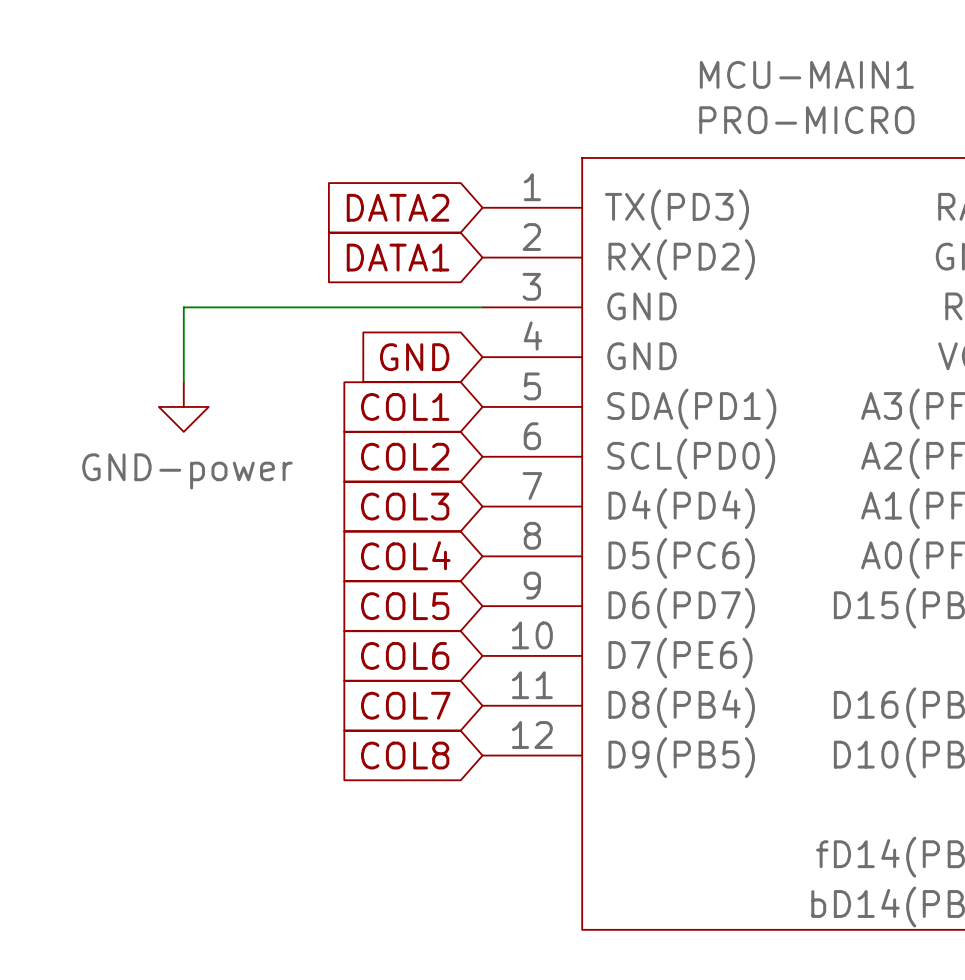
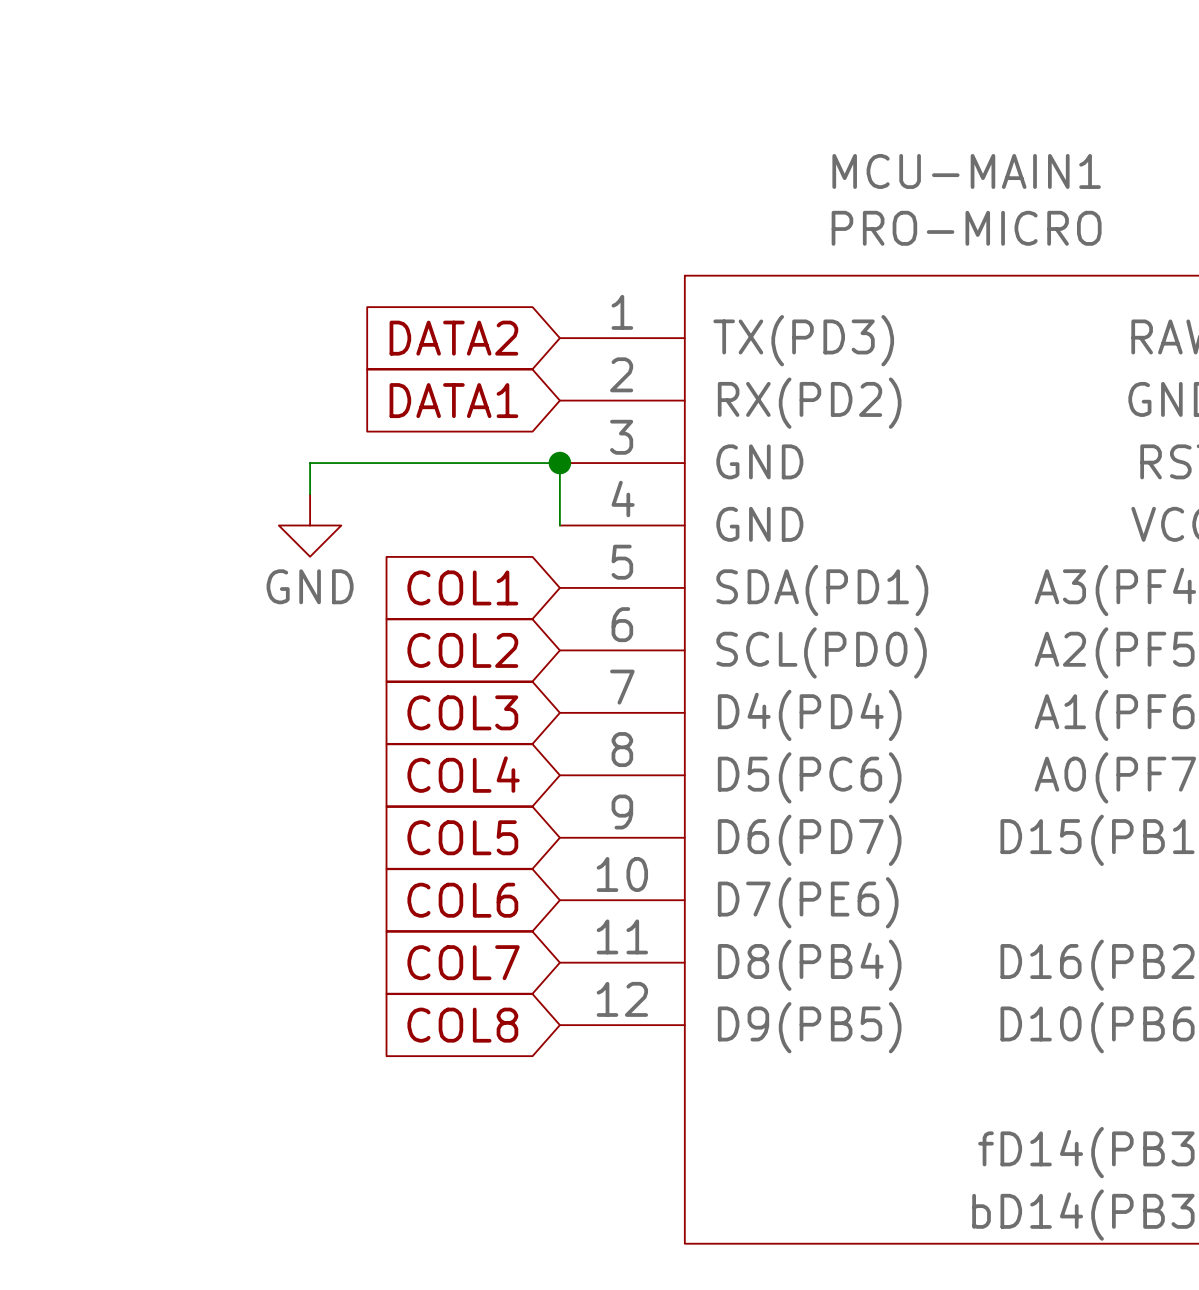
wire: (283, 307) (183, 307) (183, 382) -> (310, 463) (310, 494)
wire: none -> (559, 463) (559, 525)
junction: none -> (559, 463)
power symbol: none -> GND (310, 525)
global label: GND (414, 357) -> none
power symbol: GND-power (183, 406) -> none

